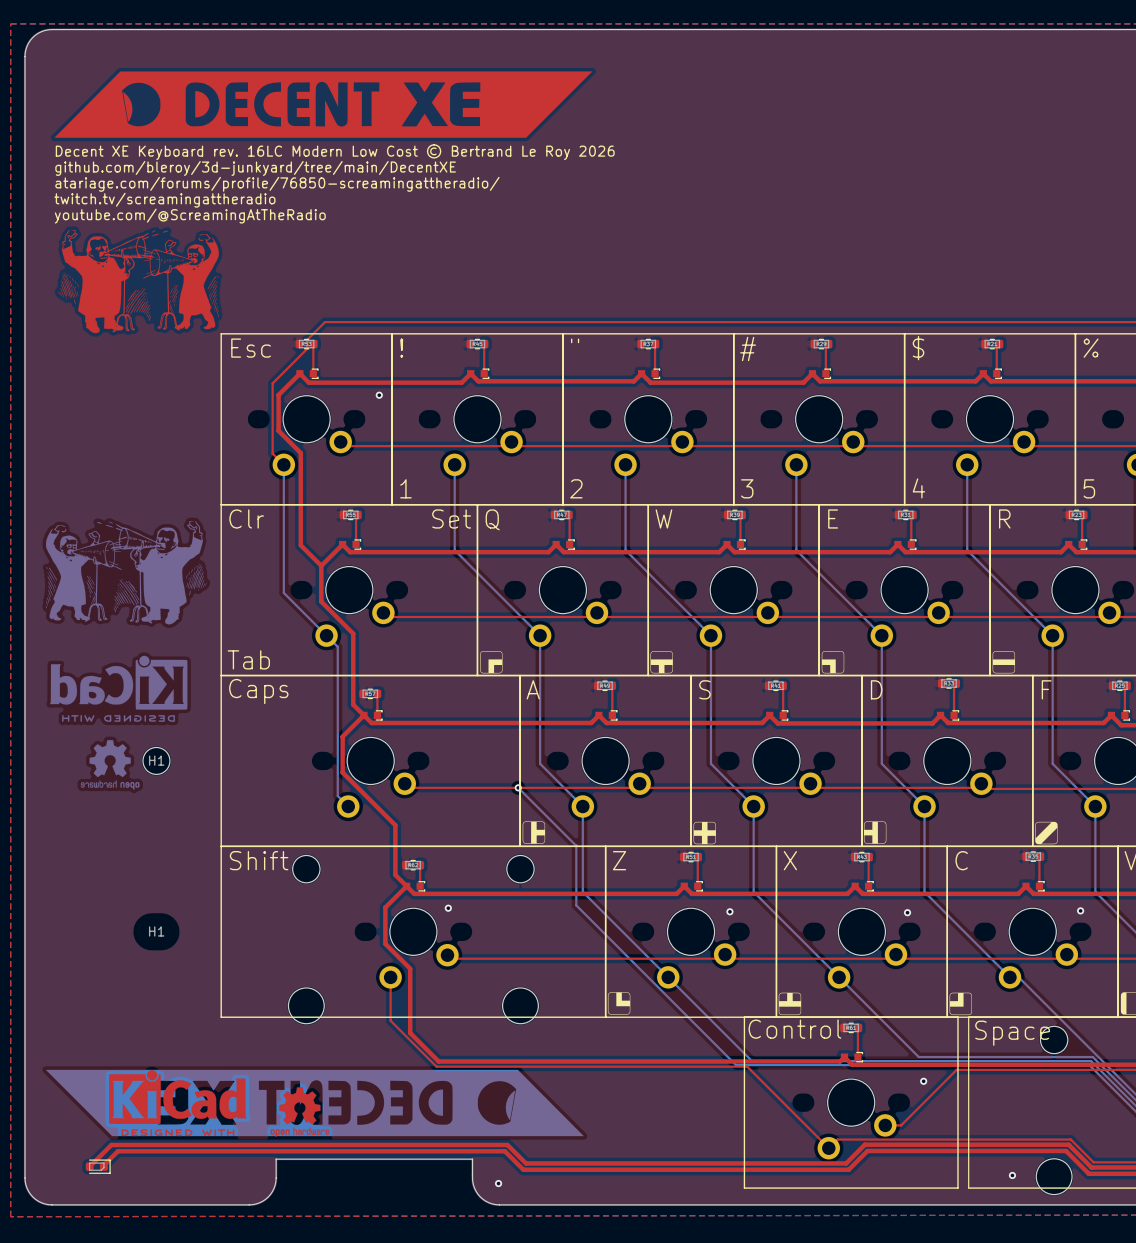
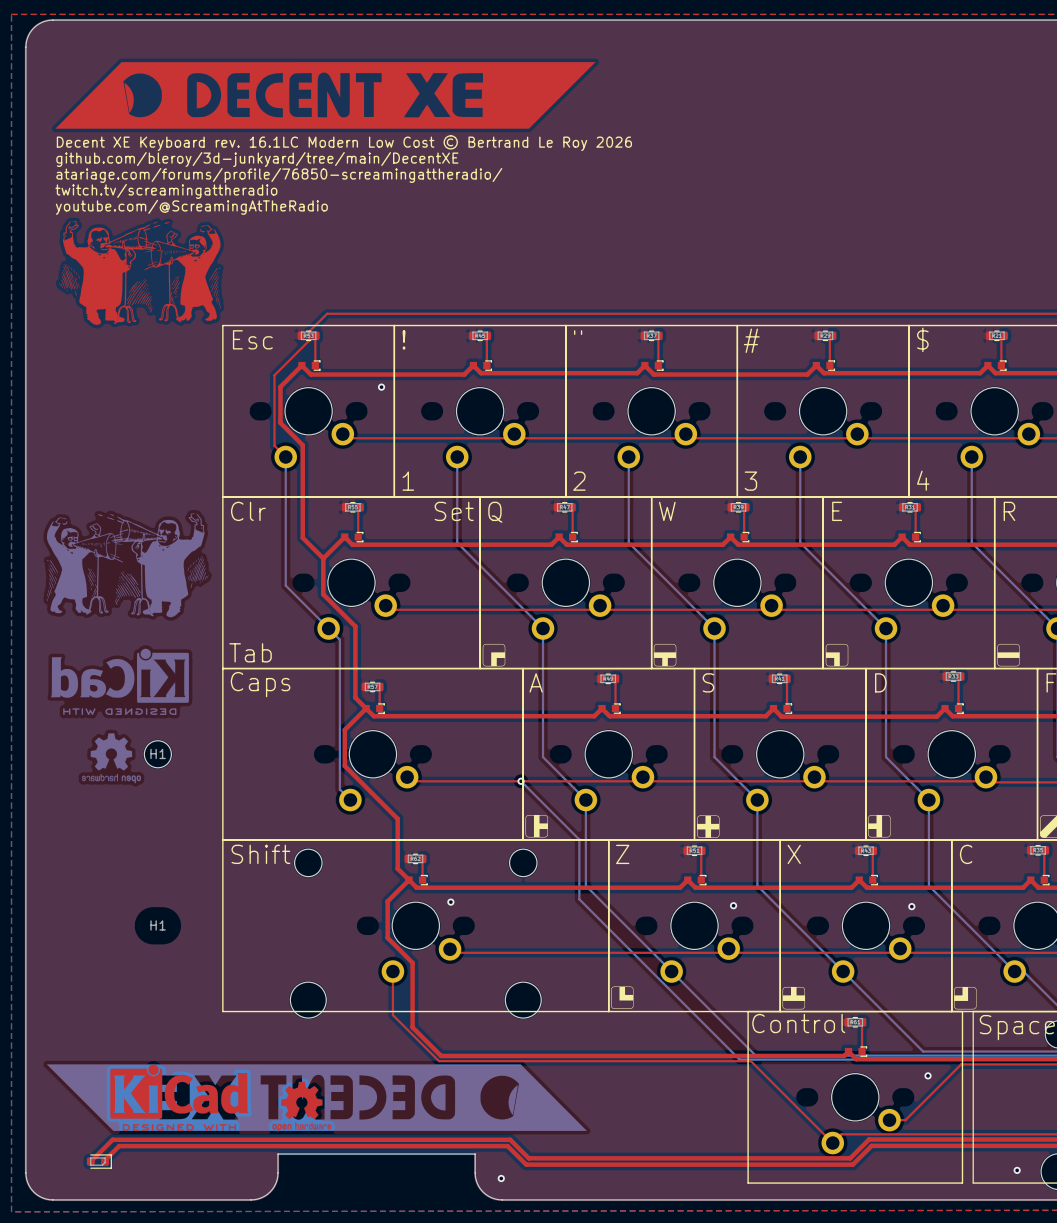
text: Decent XE Keyboard rev. 16LC Modern Low Cost © Bertrand Le Roy 2026 (335, 152) -> Decent XE Keyboard rev. 16.1LC Modern Low Cost © Bertrand Le Roy 2026 (344, 143)

